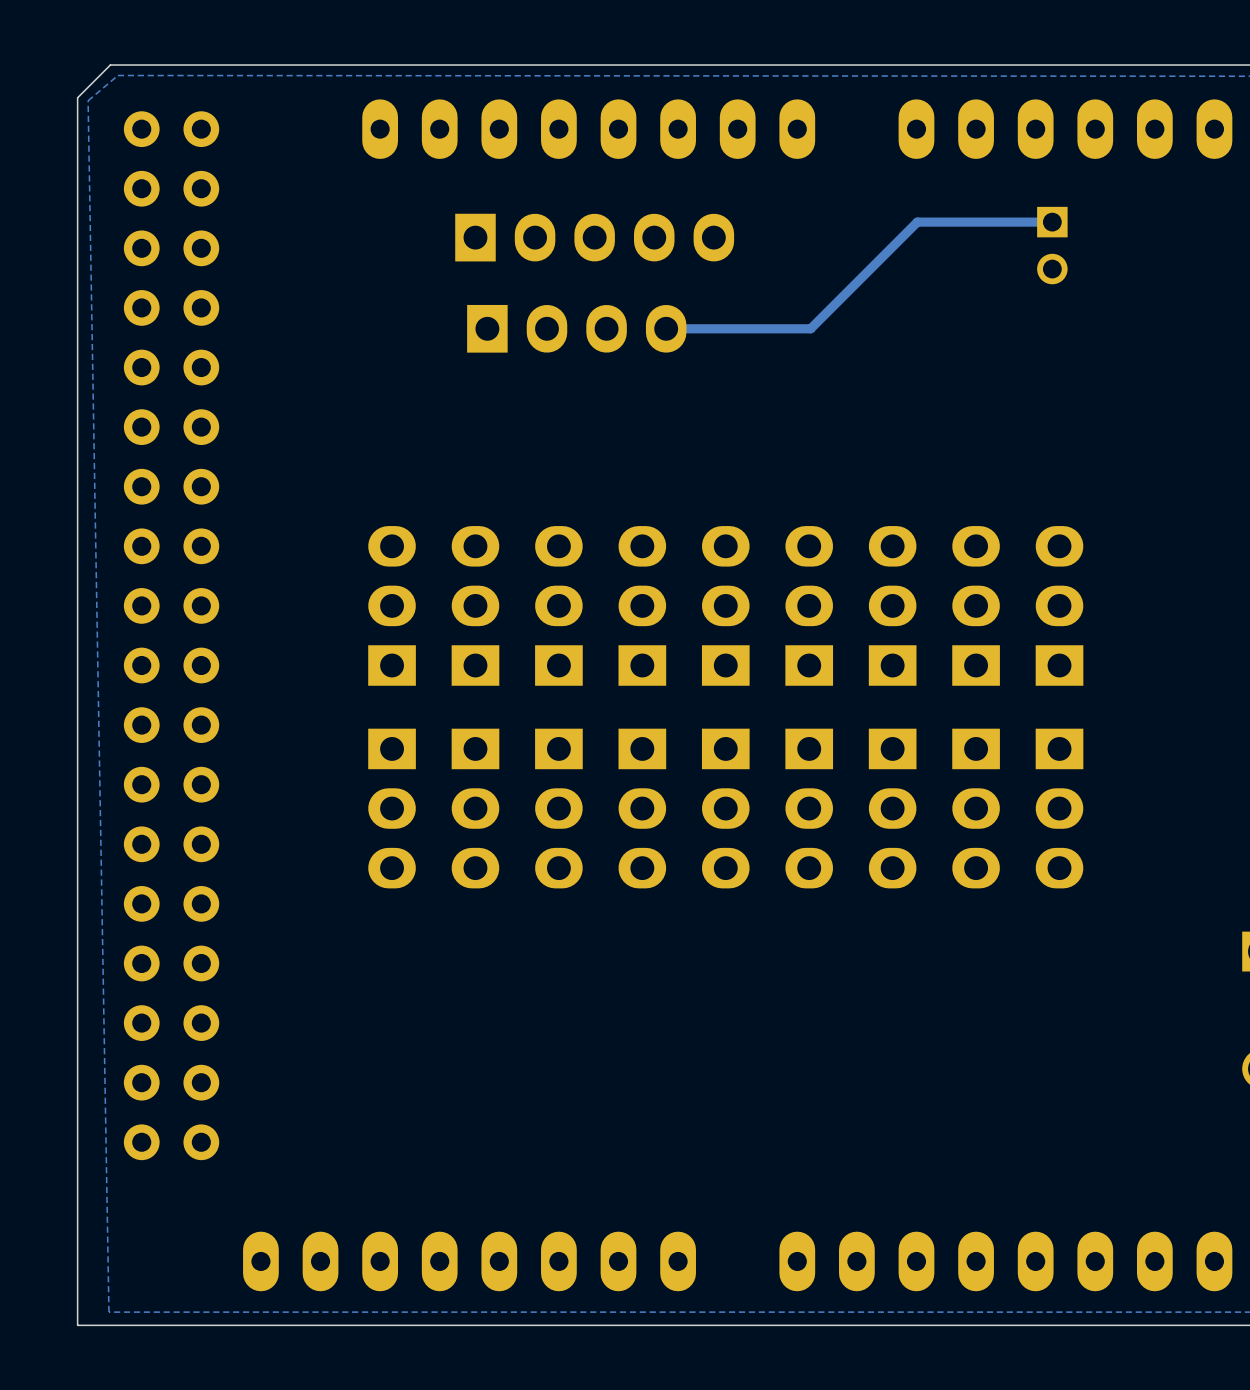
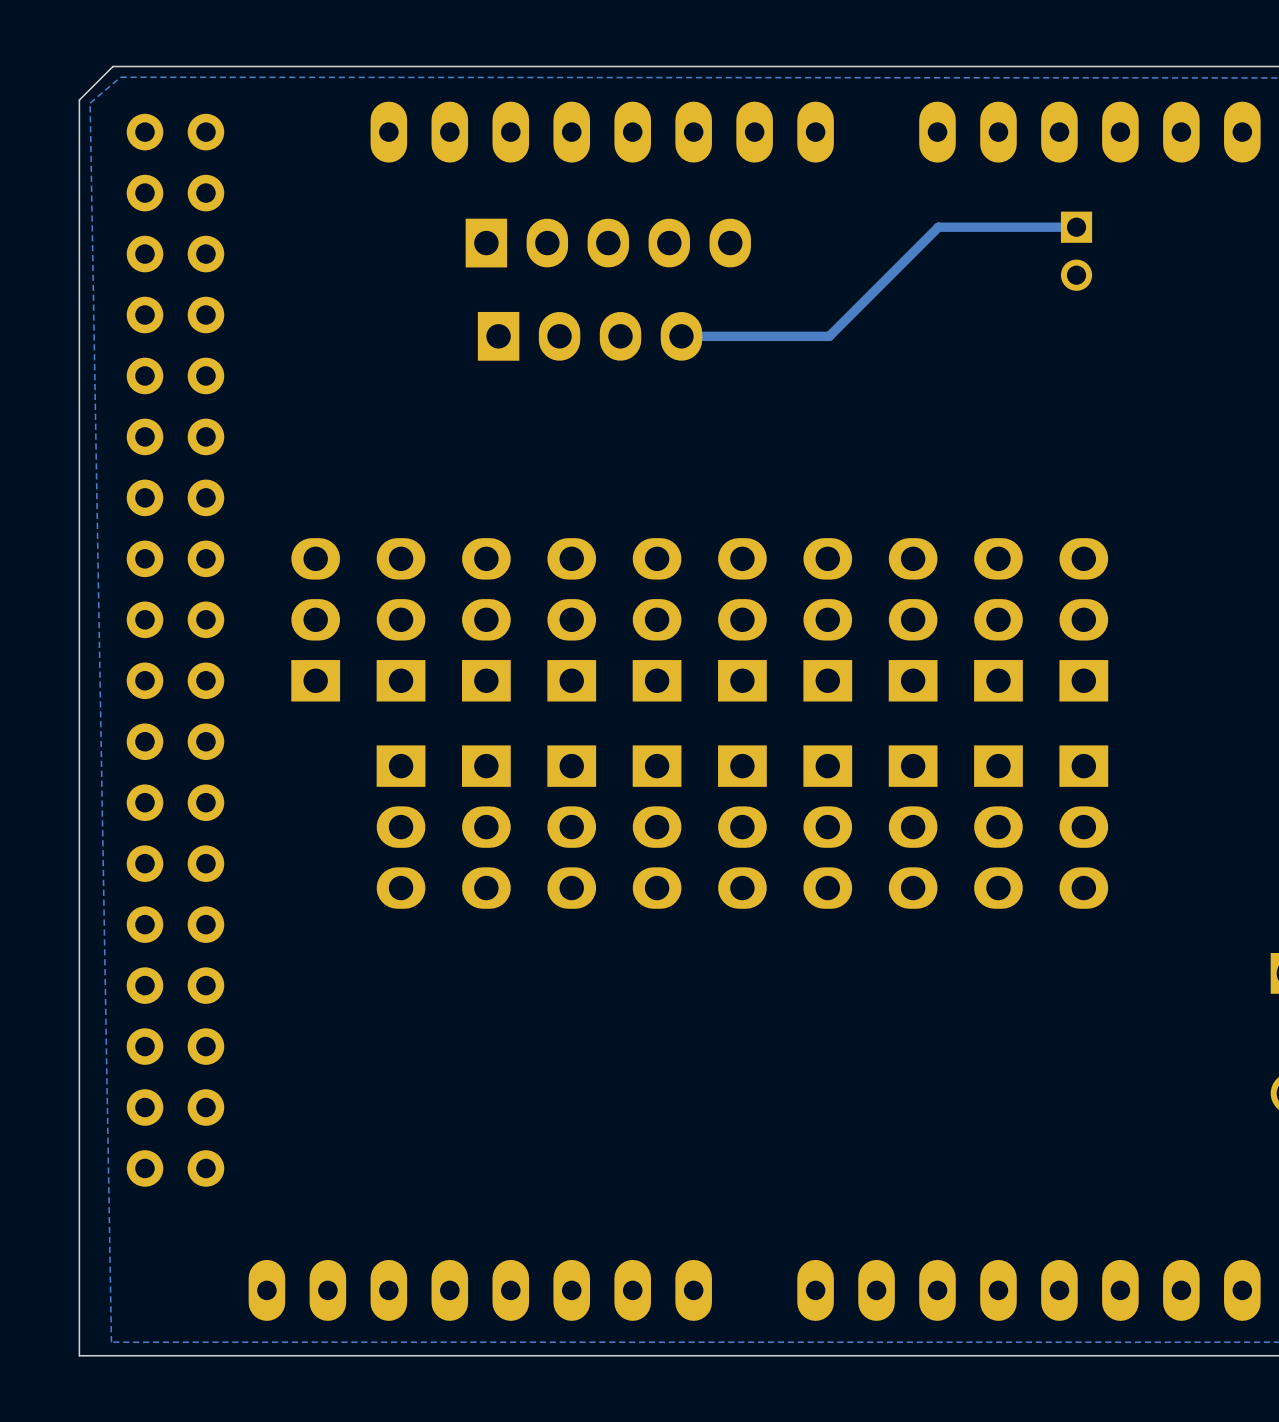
part: none -> (315, 619)

